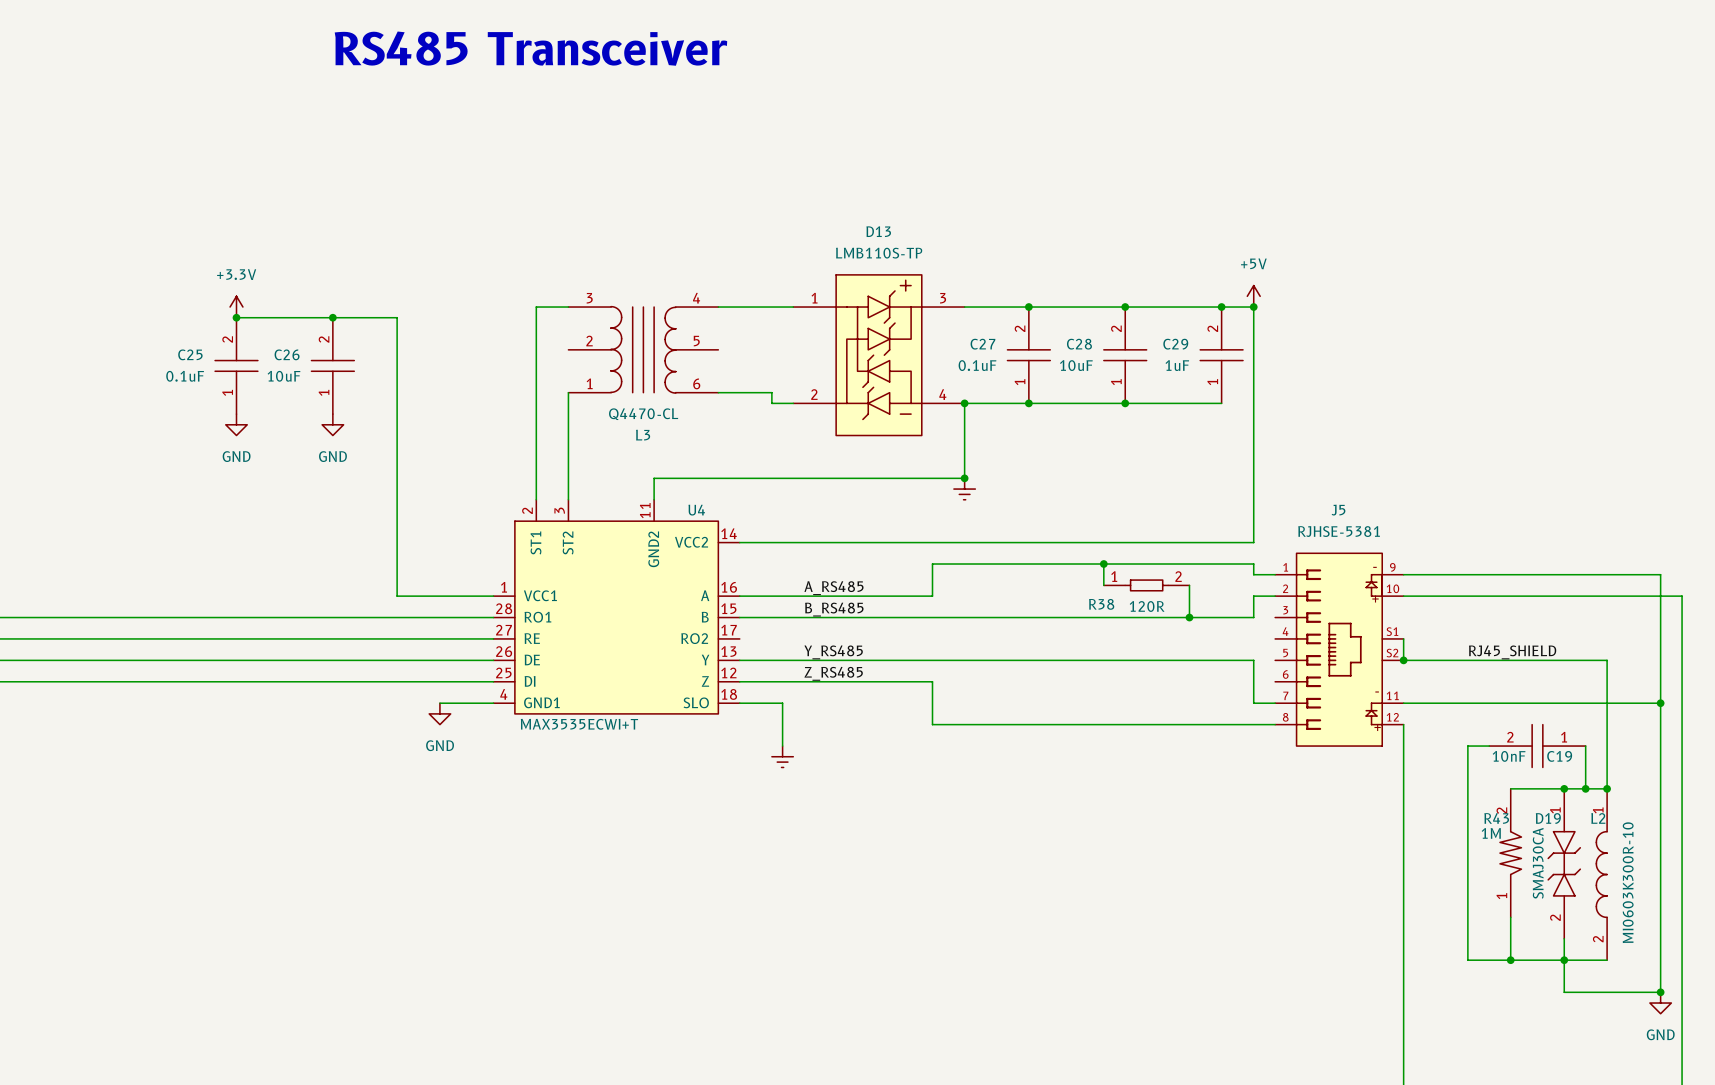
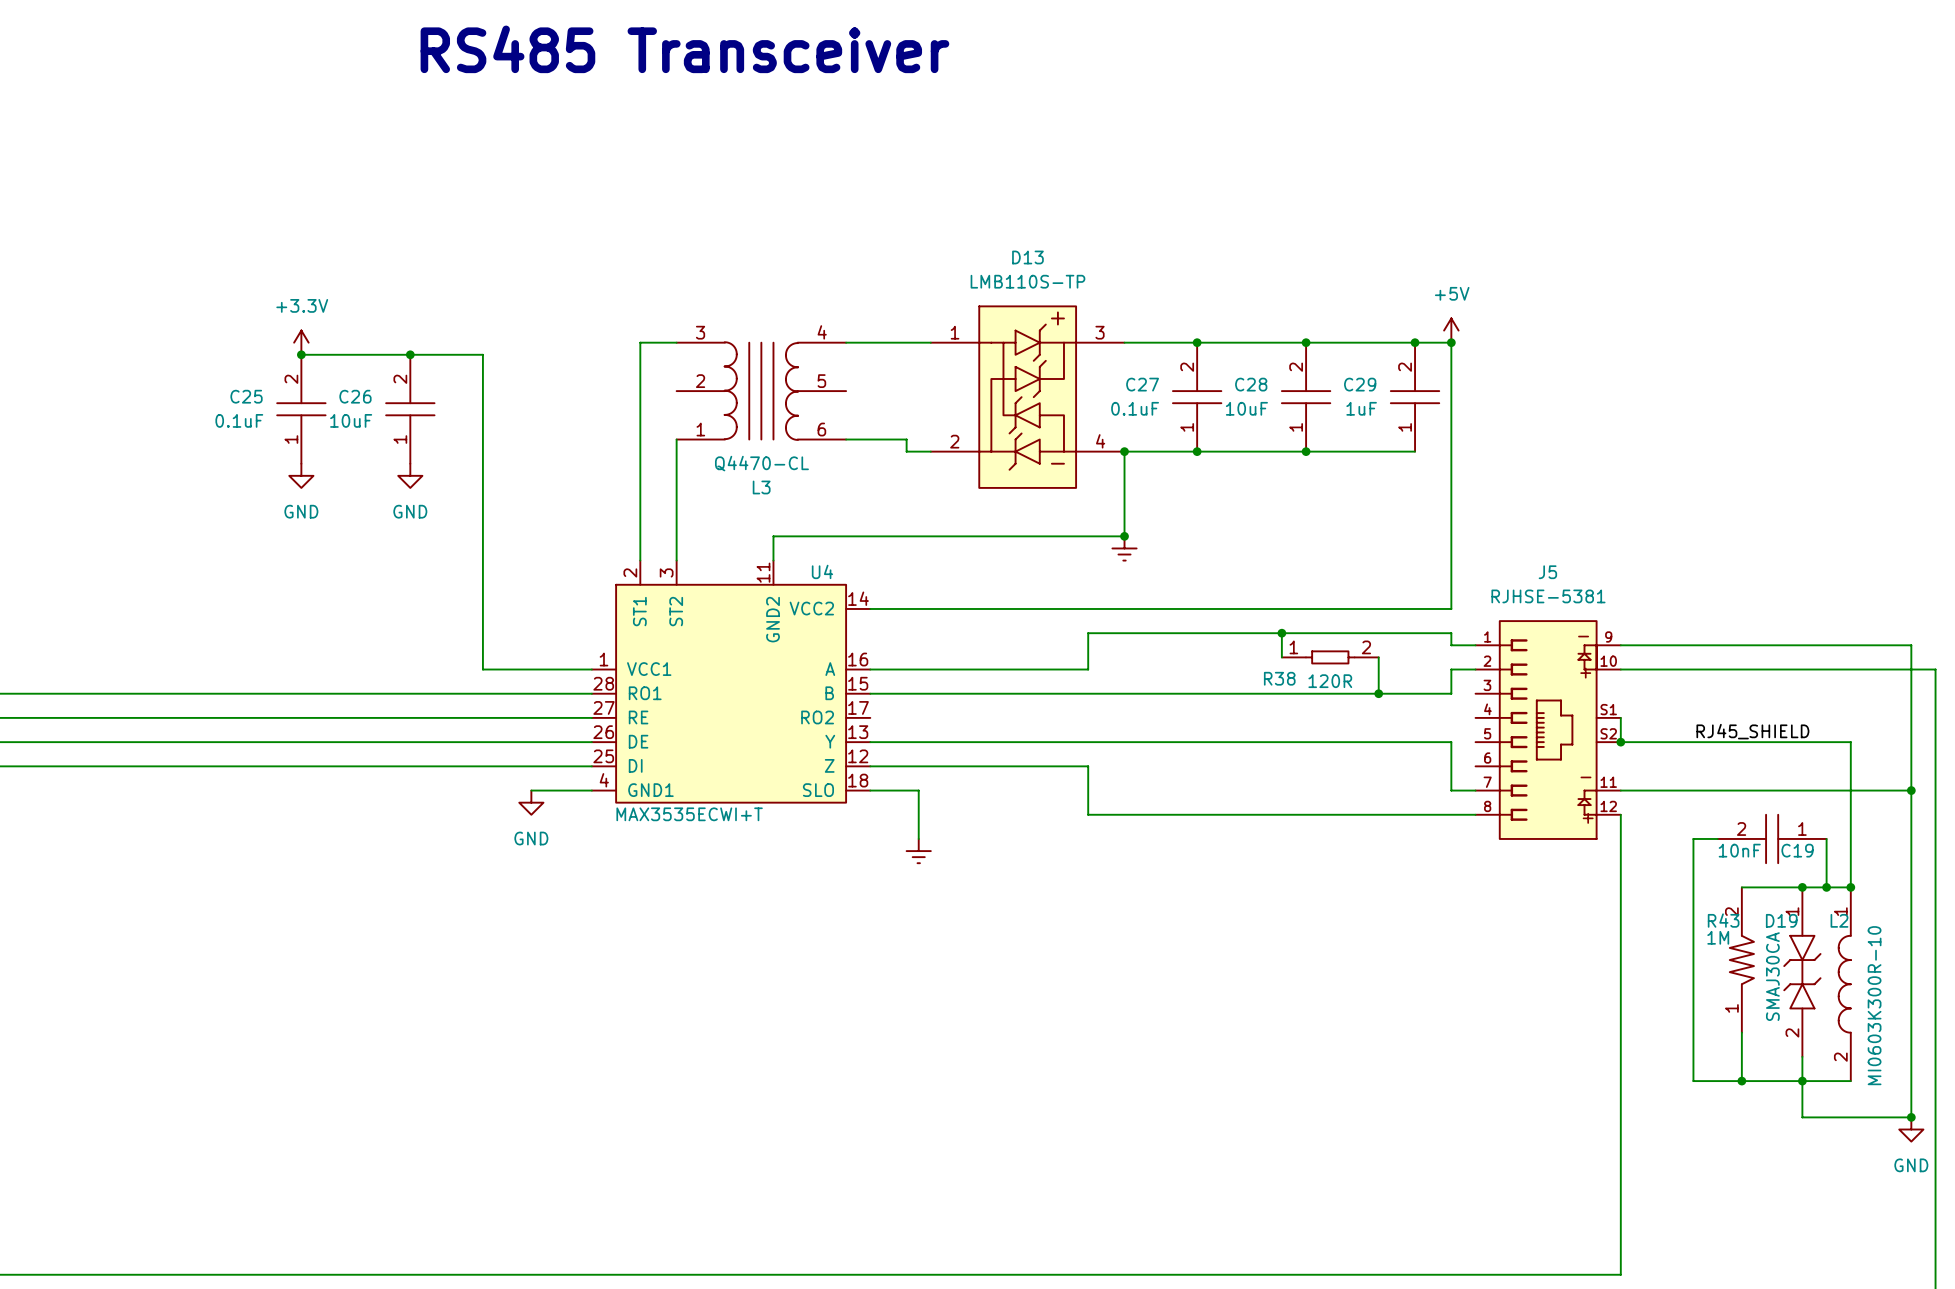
label: A_RS485 (833, 588) -> none
label: B_RS485 (834, 609) -> none
label: Y_RS485 (833, 652) -> none
label: Z_RS485 (833, 673) -> none

